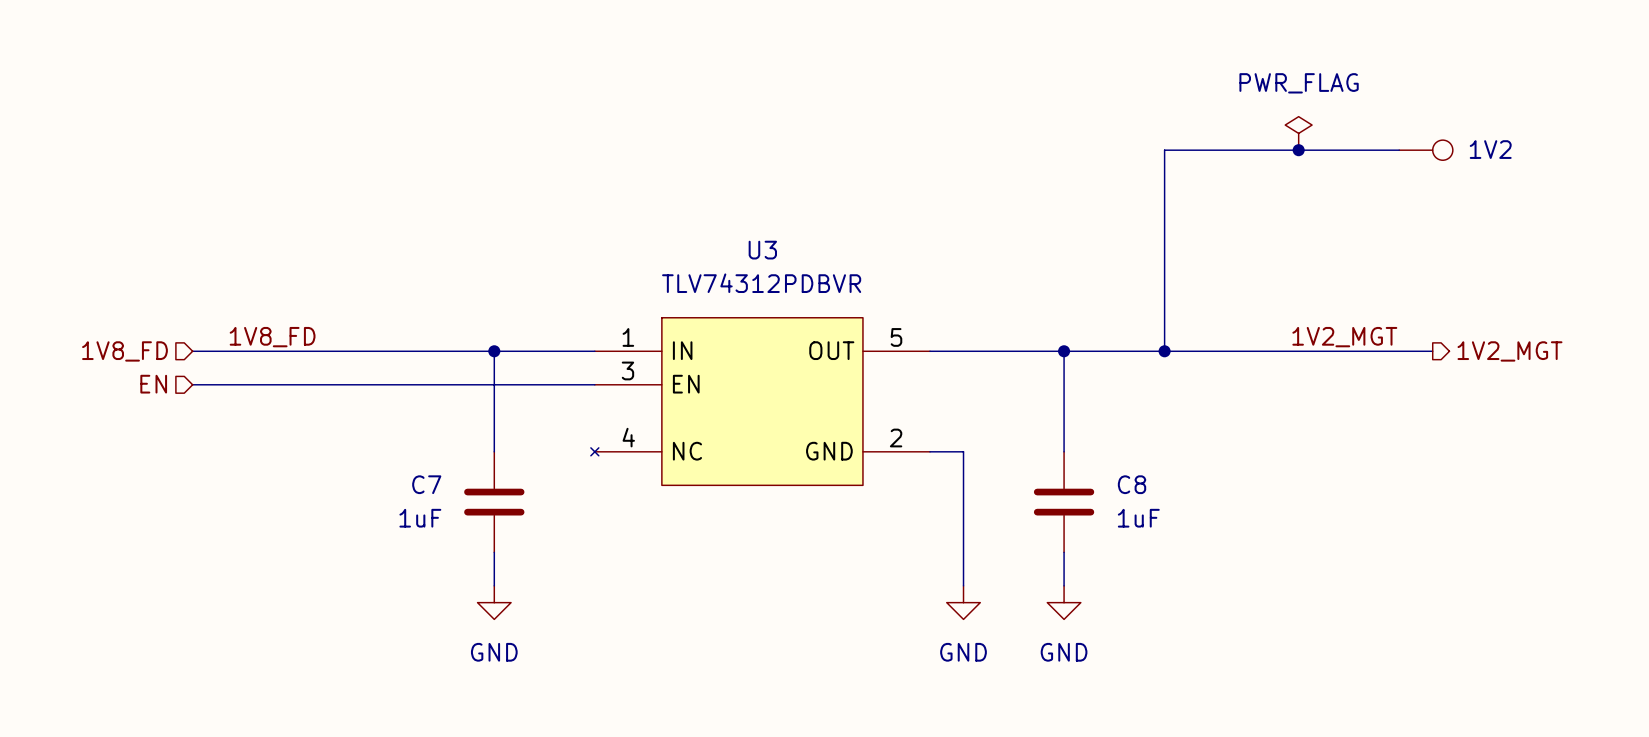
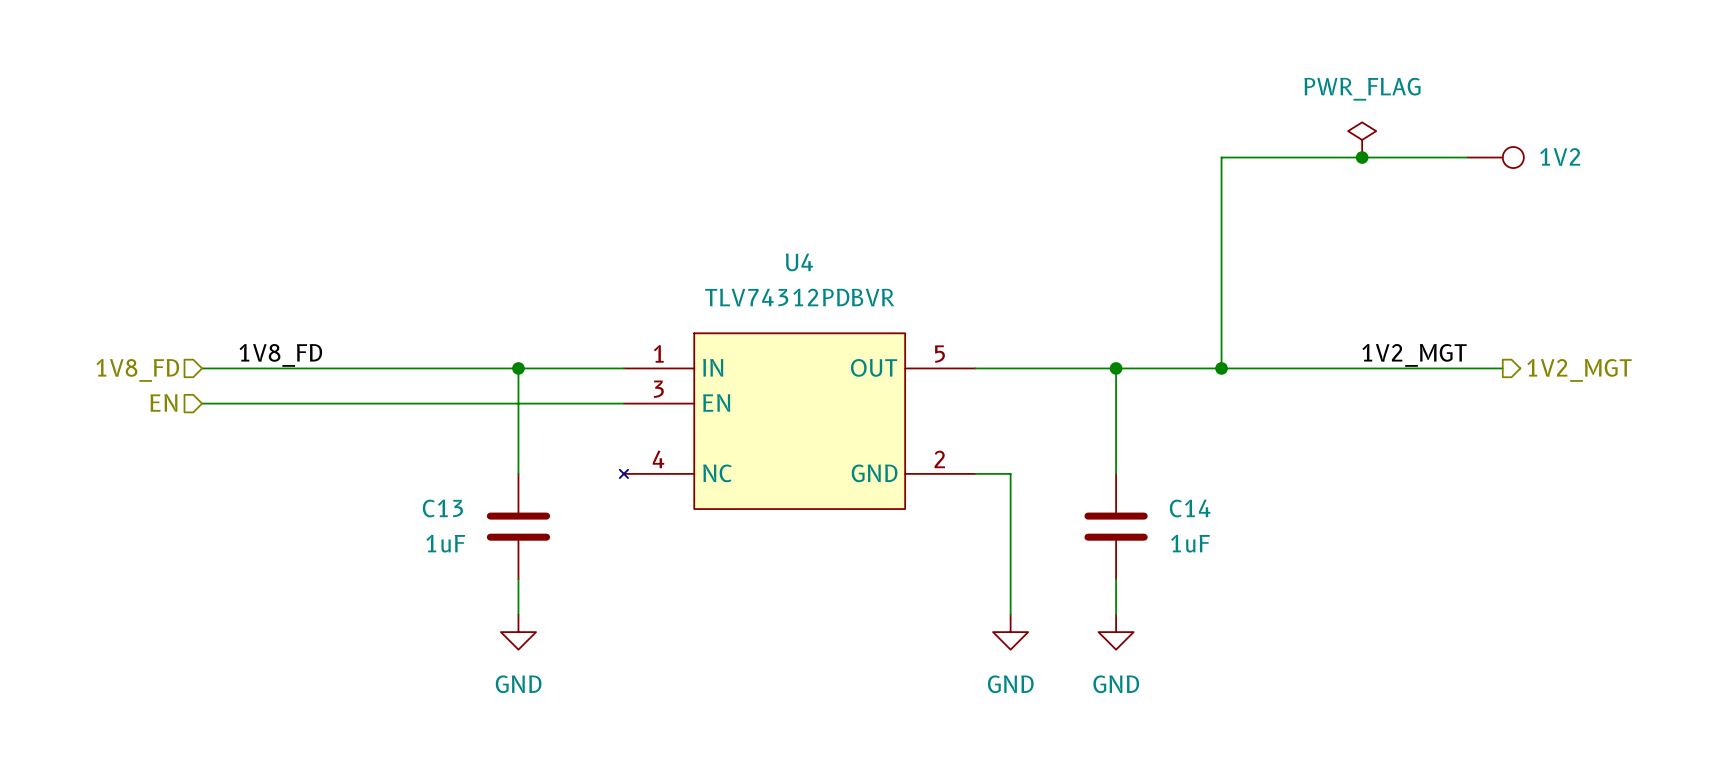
U3 name: U3 (762, 250) -> U4 (799, 262)
C7 name: C7 (426, 484) -> C13 (442, 508)
C8 name: C8 (1132, 484) -> C14 (1190, 508)

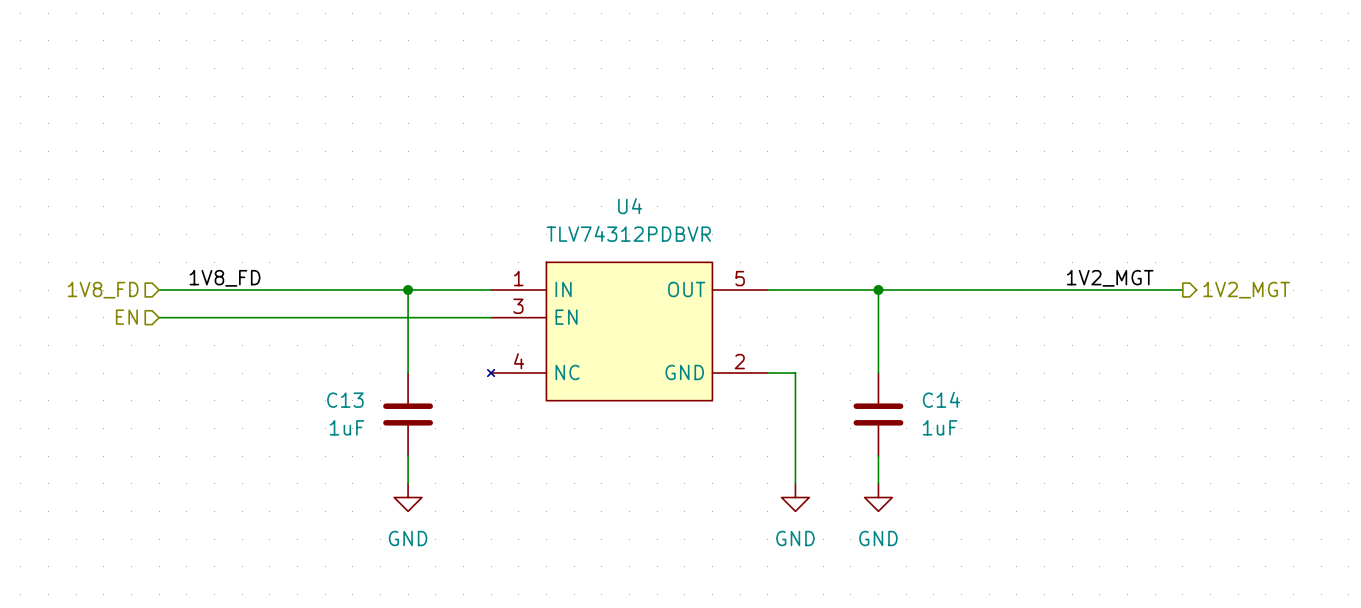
power symbol: PWR_FLAG (1362, 139) -> none
junction: (1362, 157) -> none
wire: (1467, 157) (1221, 157) (1221, 368) -> none
1V2: (1495, 157) -> none
junction: (1221, 368) -> none

